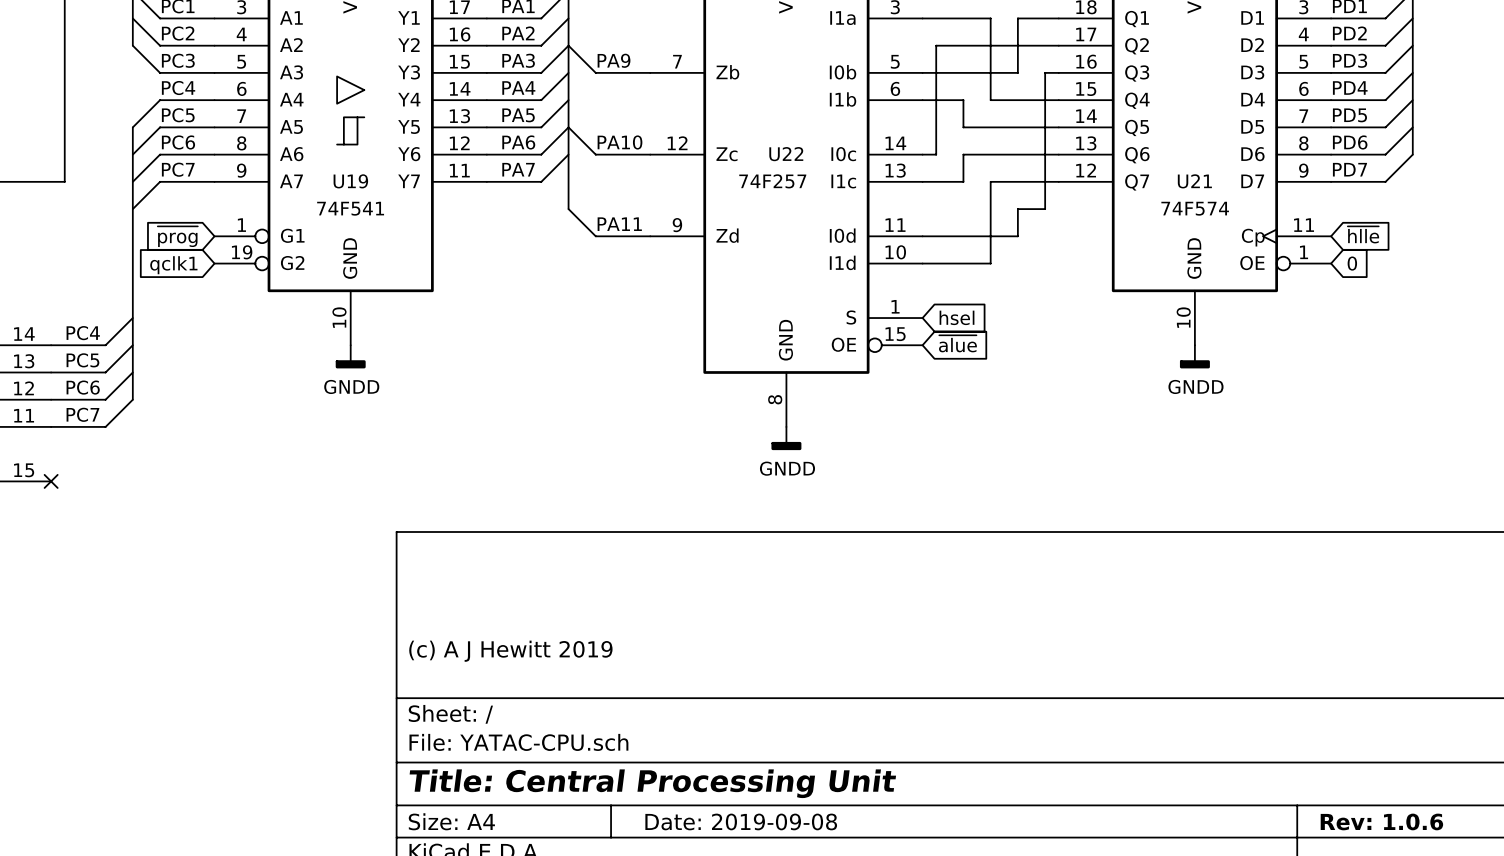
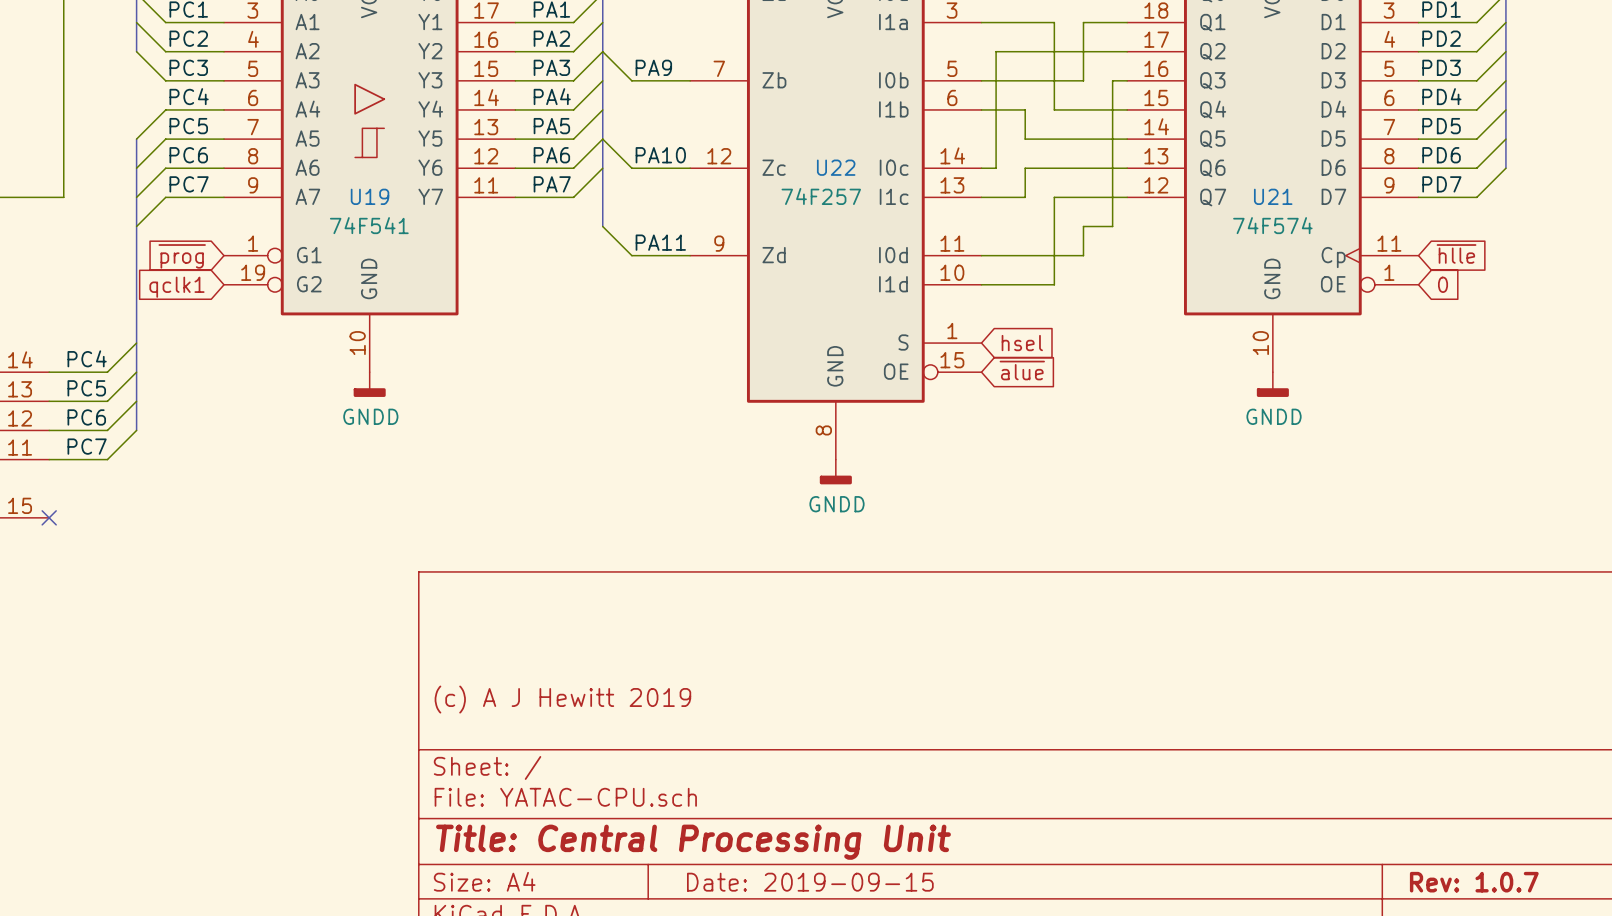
title block: Date: 2019-09-08 (741, 821) -> Date: 2019-09-15 (810, 882)
title block: Rev: 1.0.6 (1381, 821) -> Rev: 1.0.7 (1474, 882)

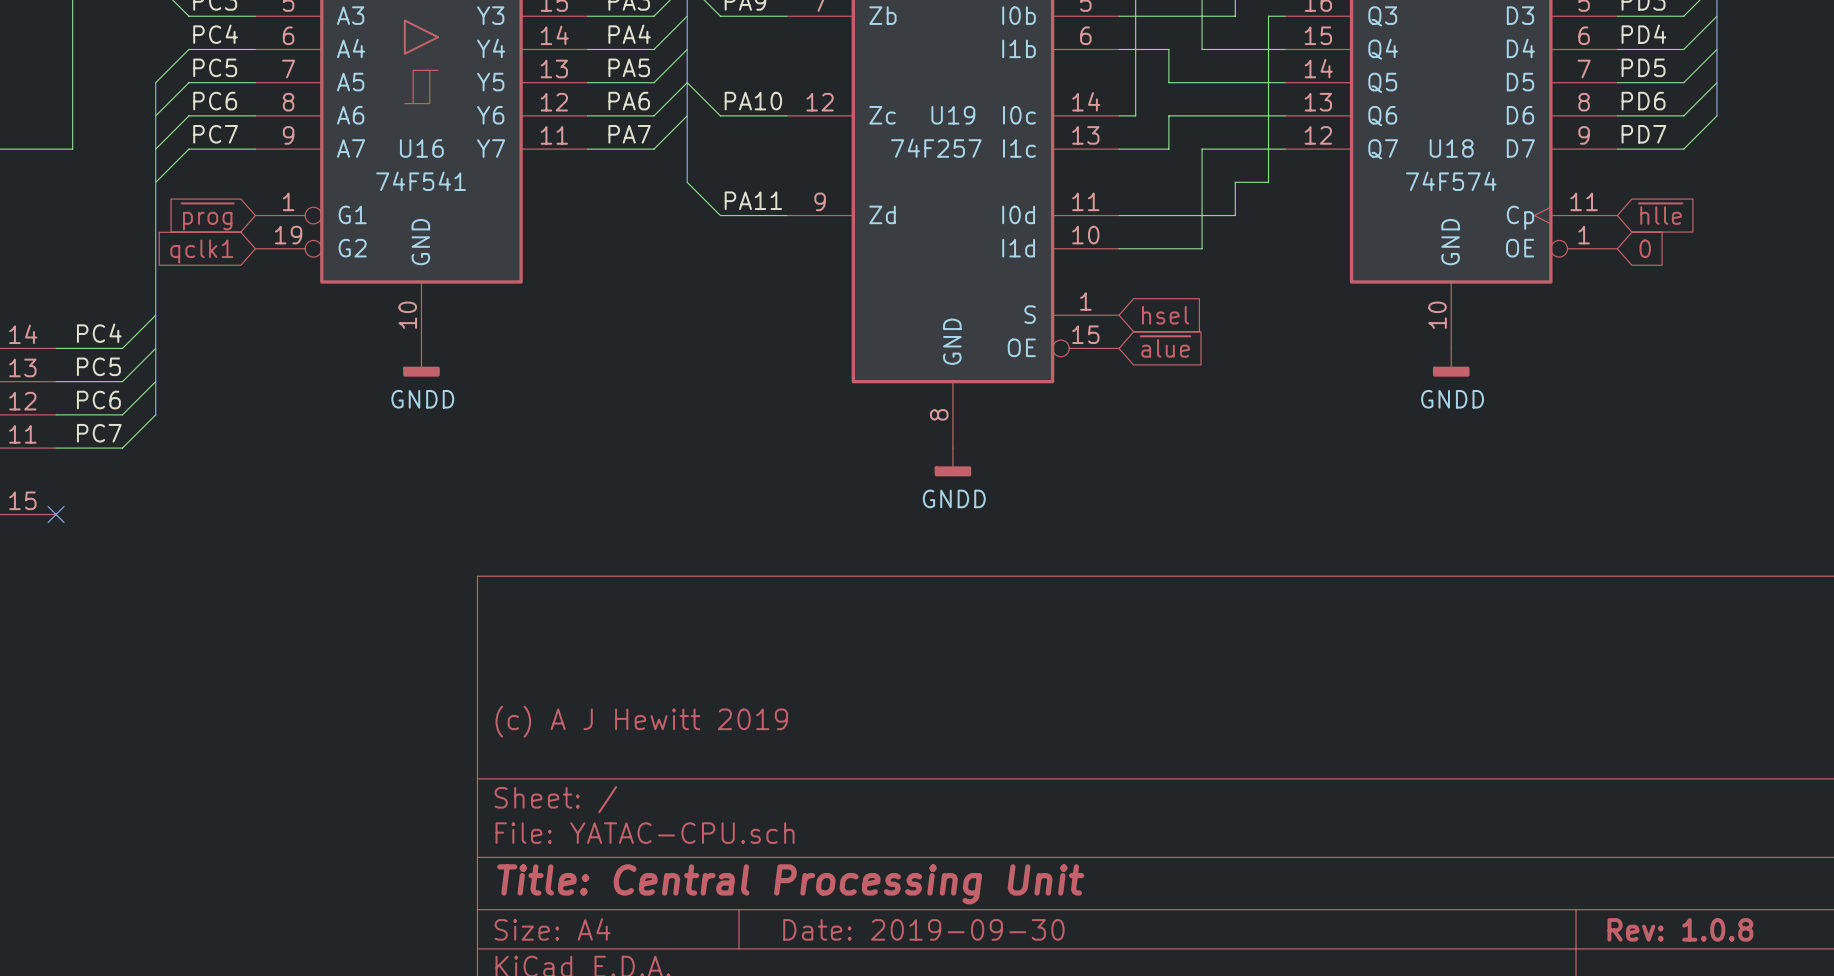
U22 name: U22 (836, 167) -> U19 (953, 115)
U19 name: U19 (370, 196) -> U16 (421, 148)
U21 name: U21 (1273, 196) -> U18 (1451, 148)
title block: Date: 2019-09-15 (810, 882) -> Date: 2019-09-30 (923, 929)
title block: Rev: 1.0.7 (1474, 882) -> Rev: 1.0.8 (1680, 929)

